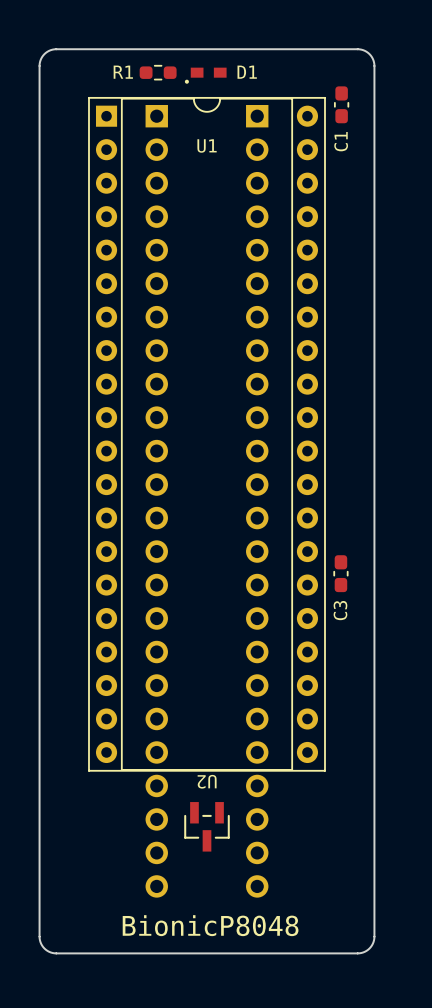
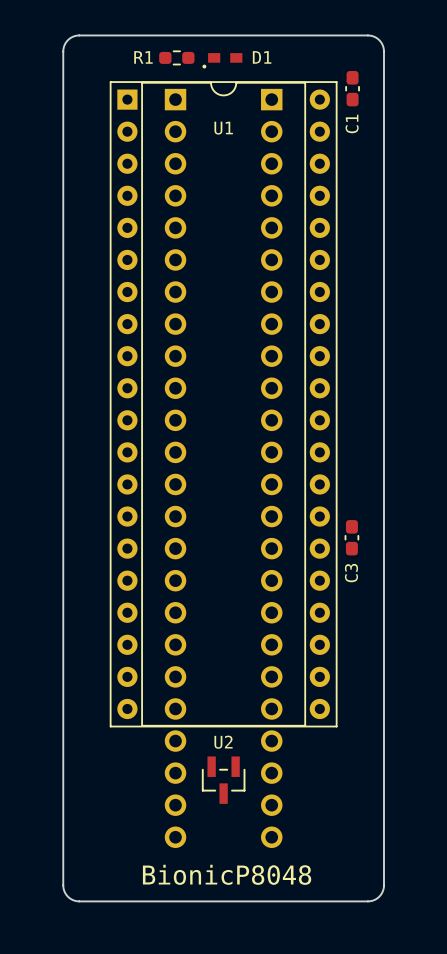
U2 name rotation: 0° (207, 781) -> 180° (223, 742)

